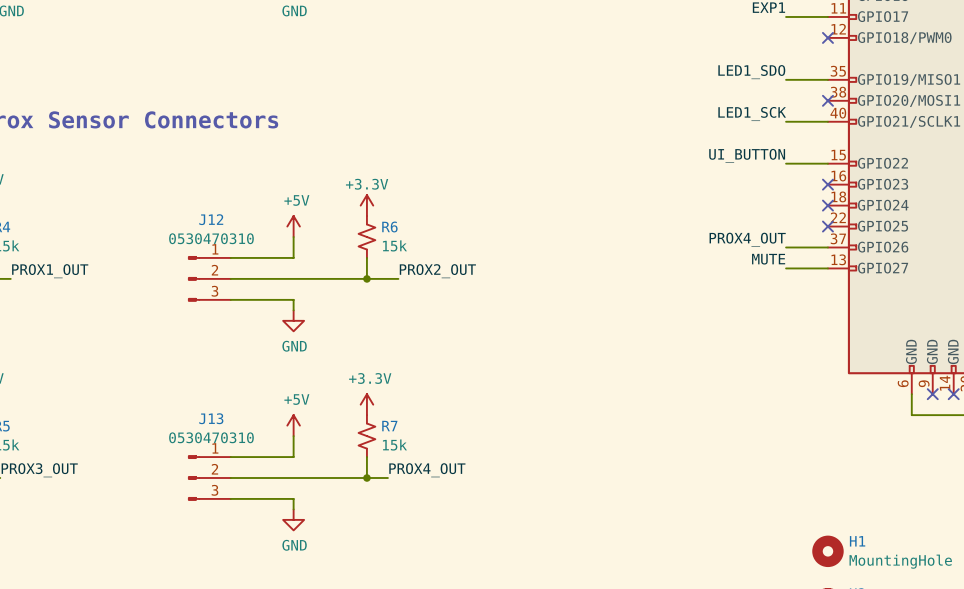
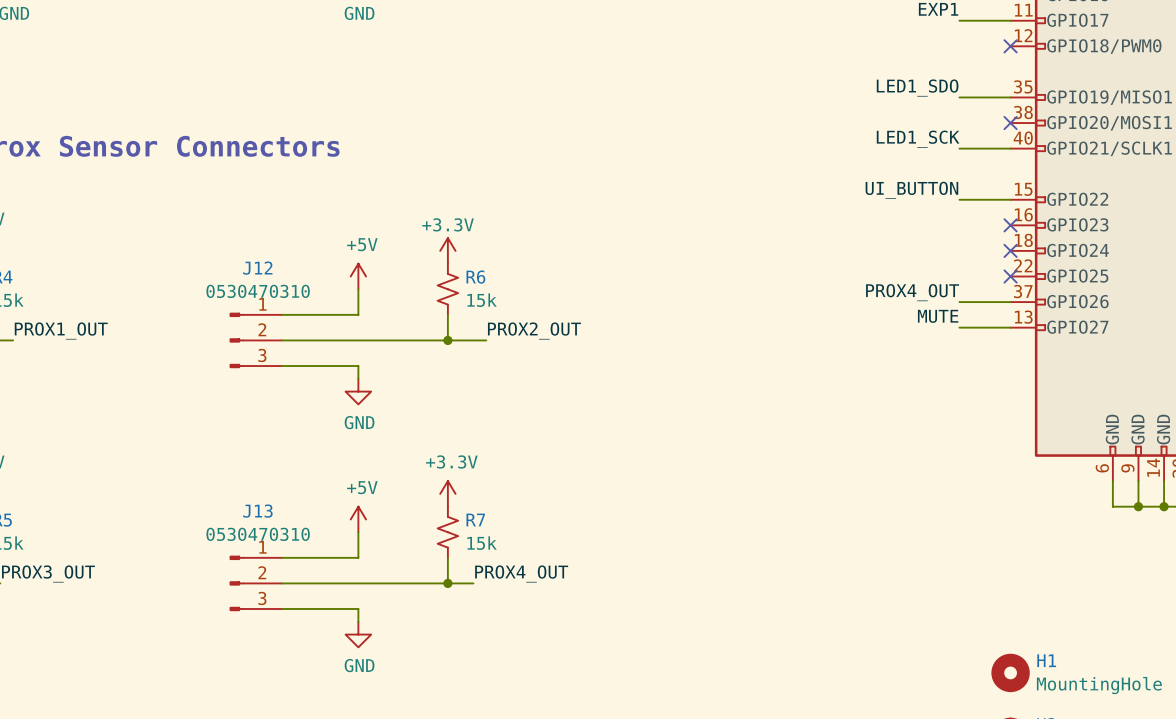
wire: none -> (1138, 481) (1138, 506)
no-connect mark: (932, 394) -> none
wire: none -> (1164, 481) (1164, 506)
no-connect mark: (953, 394) -> none
junction: none -> (1138, 506)
junction: none -> (1164, 506)

